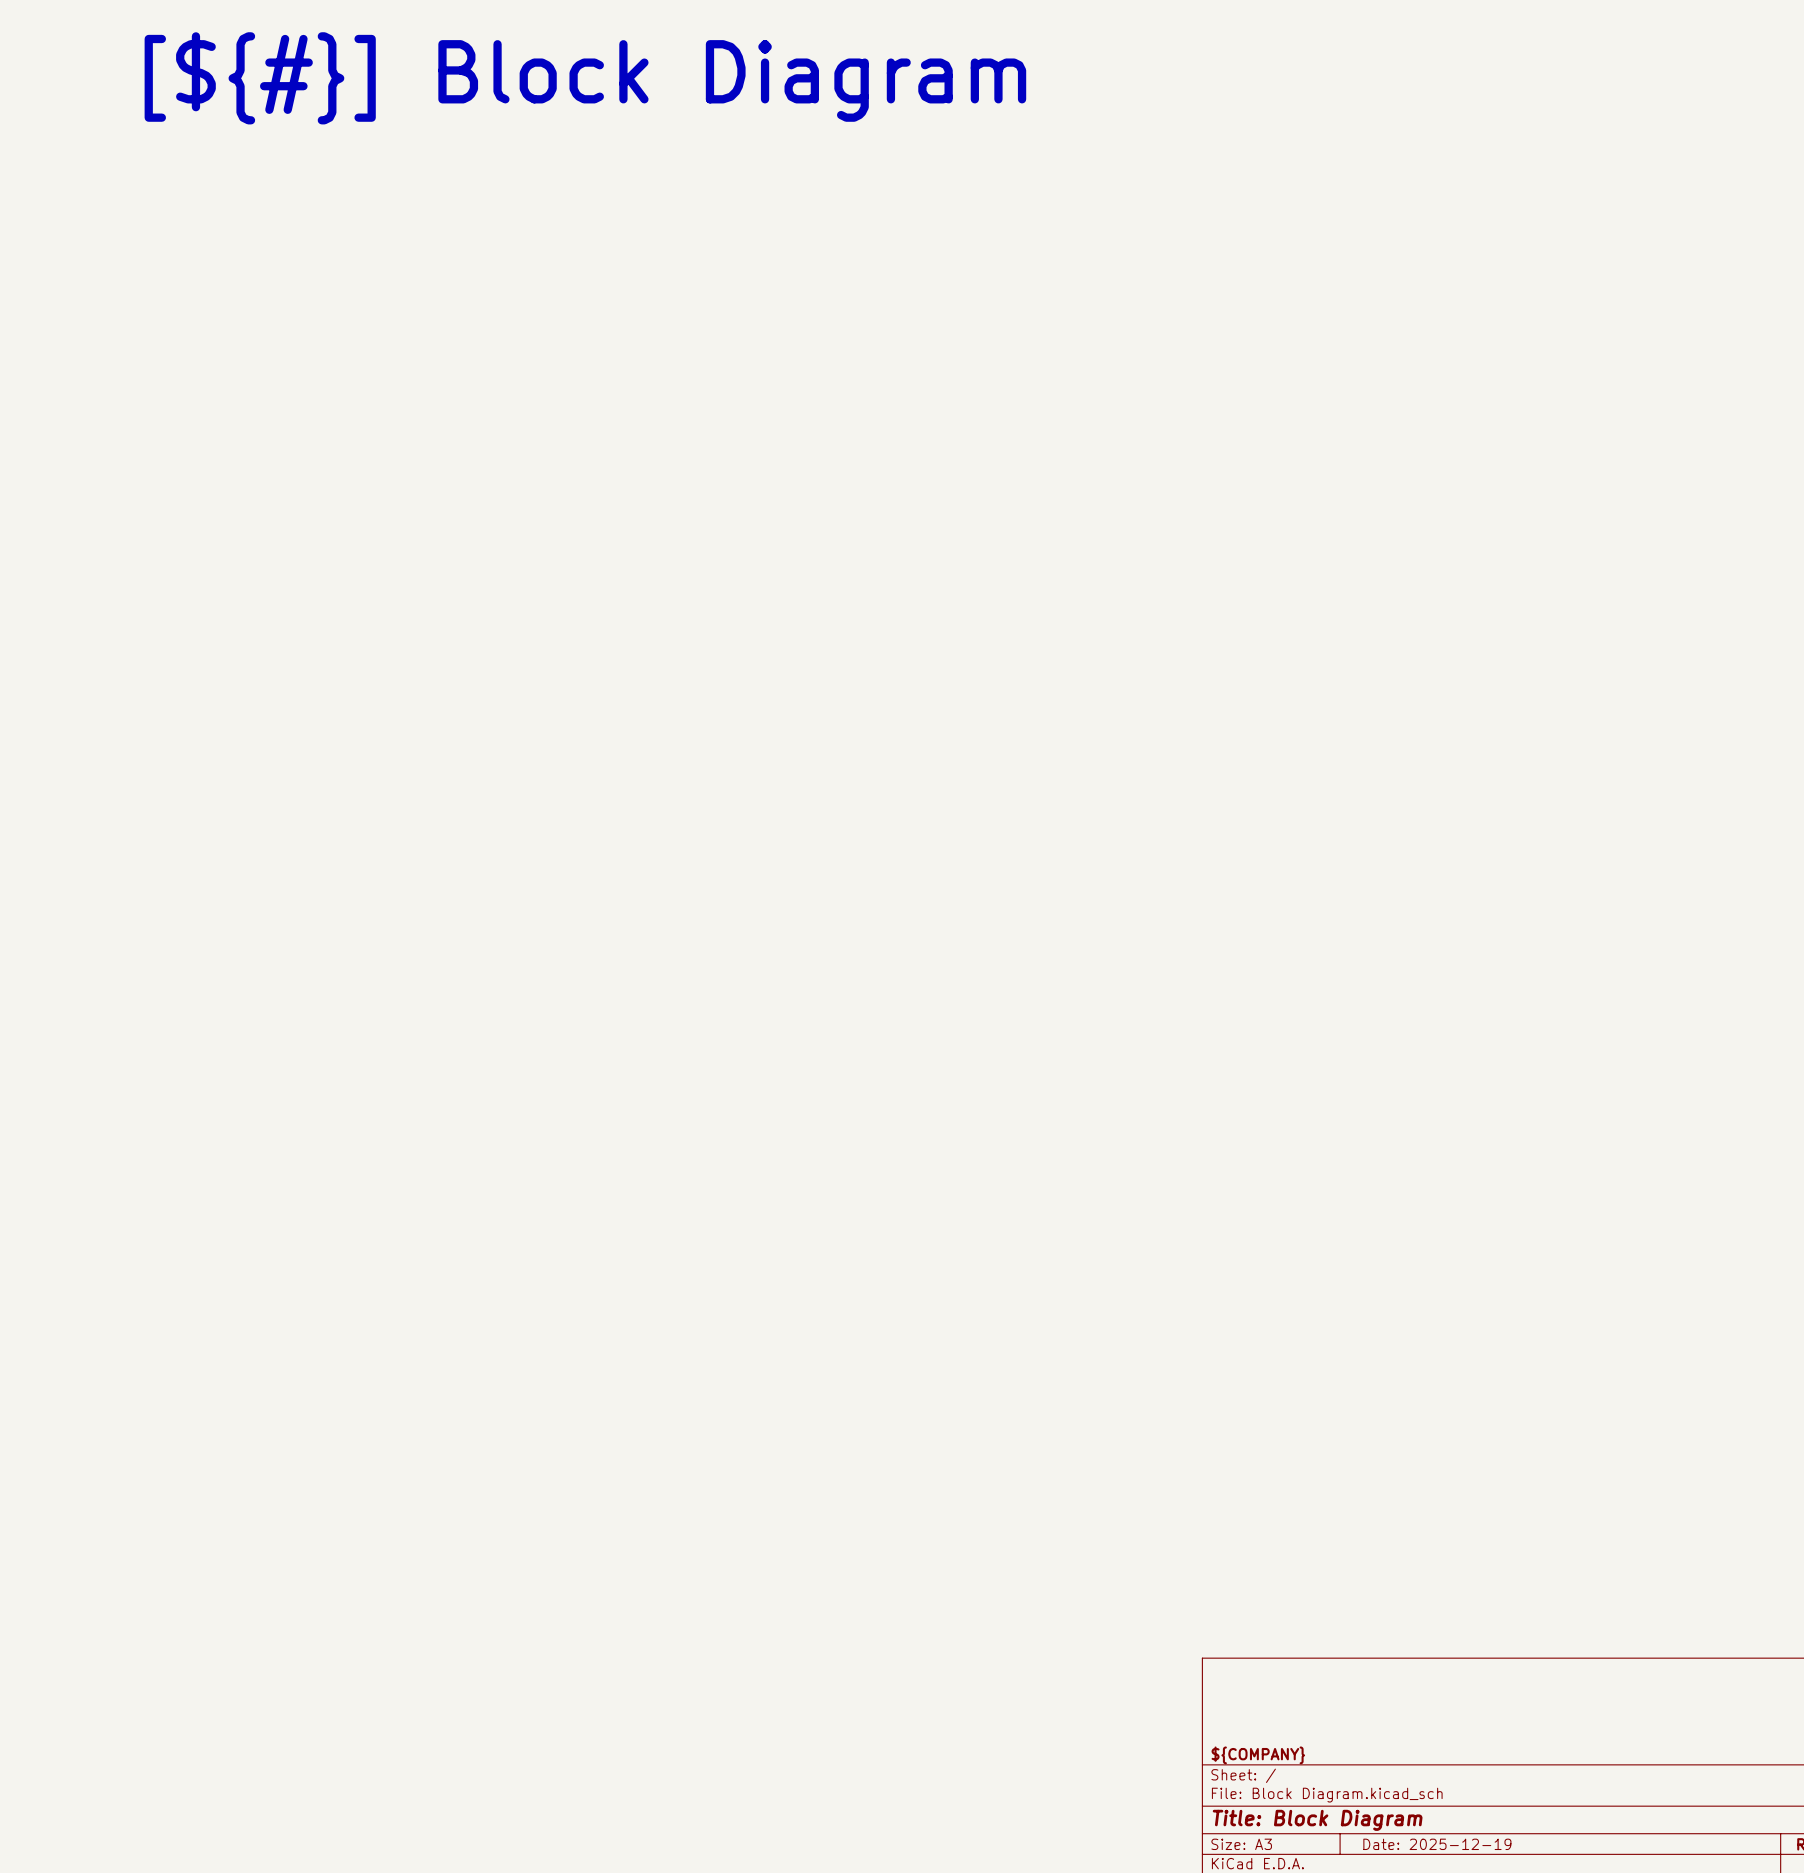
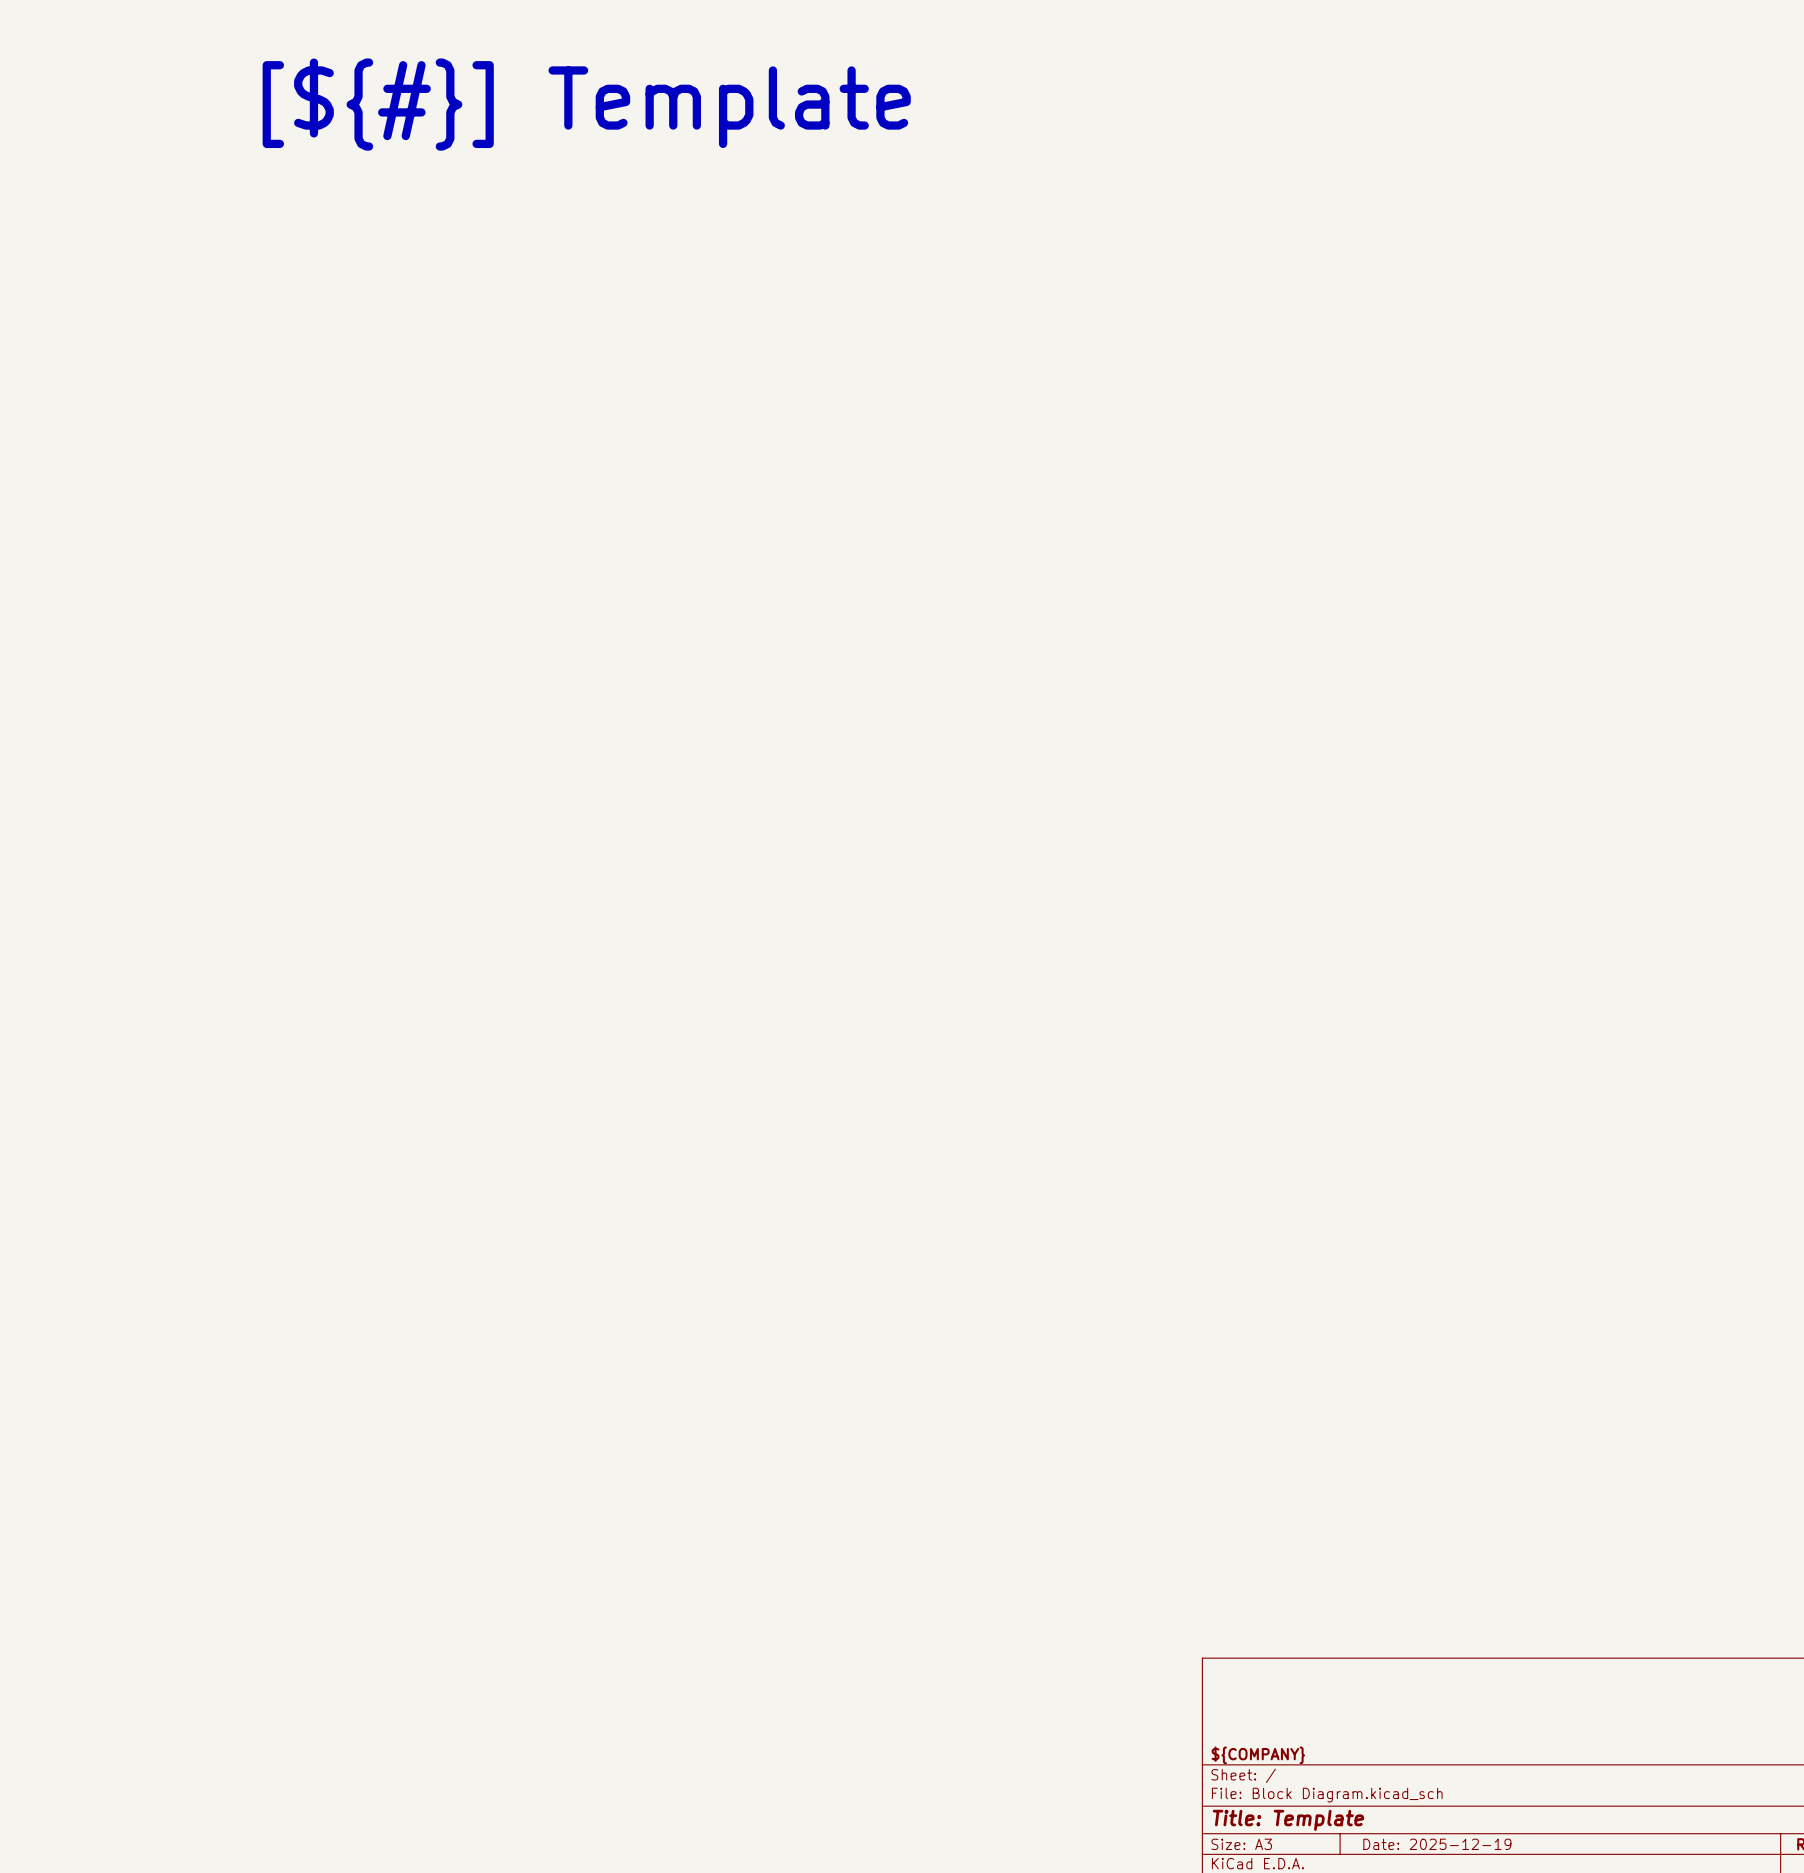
text: [${#}] Block Diagram (585, 78) -> none
text: none -> [${#}] Template (586, 104)
title block: Title: Block Diagram (1317, 1820) -> Title: Template (1288, 1820)

